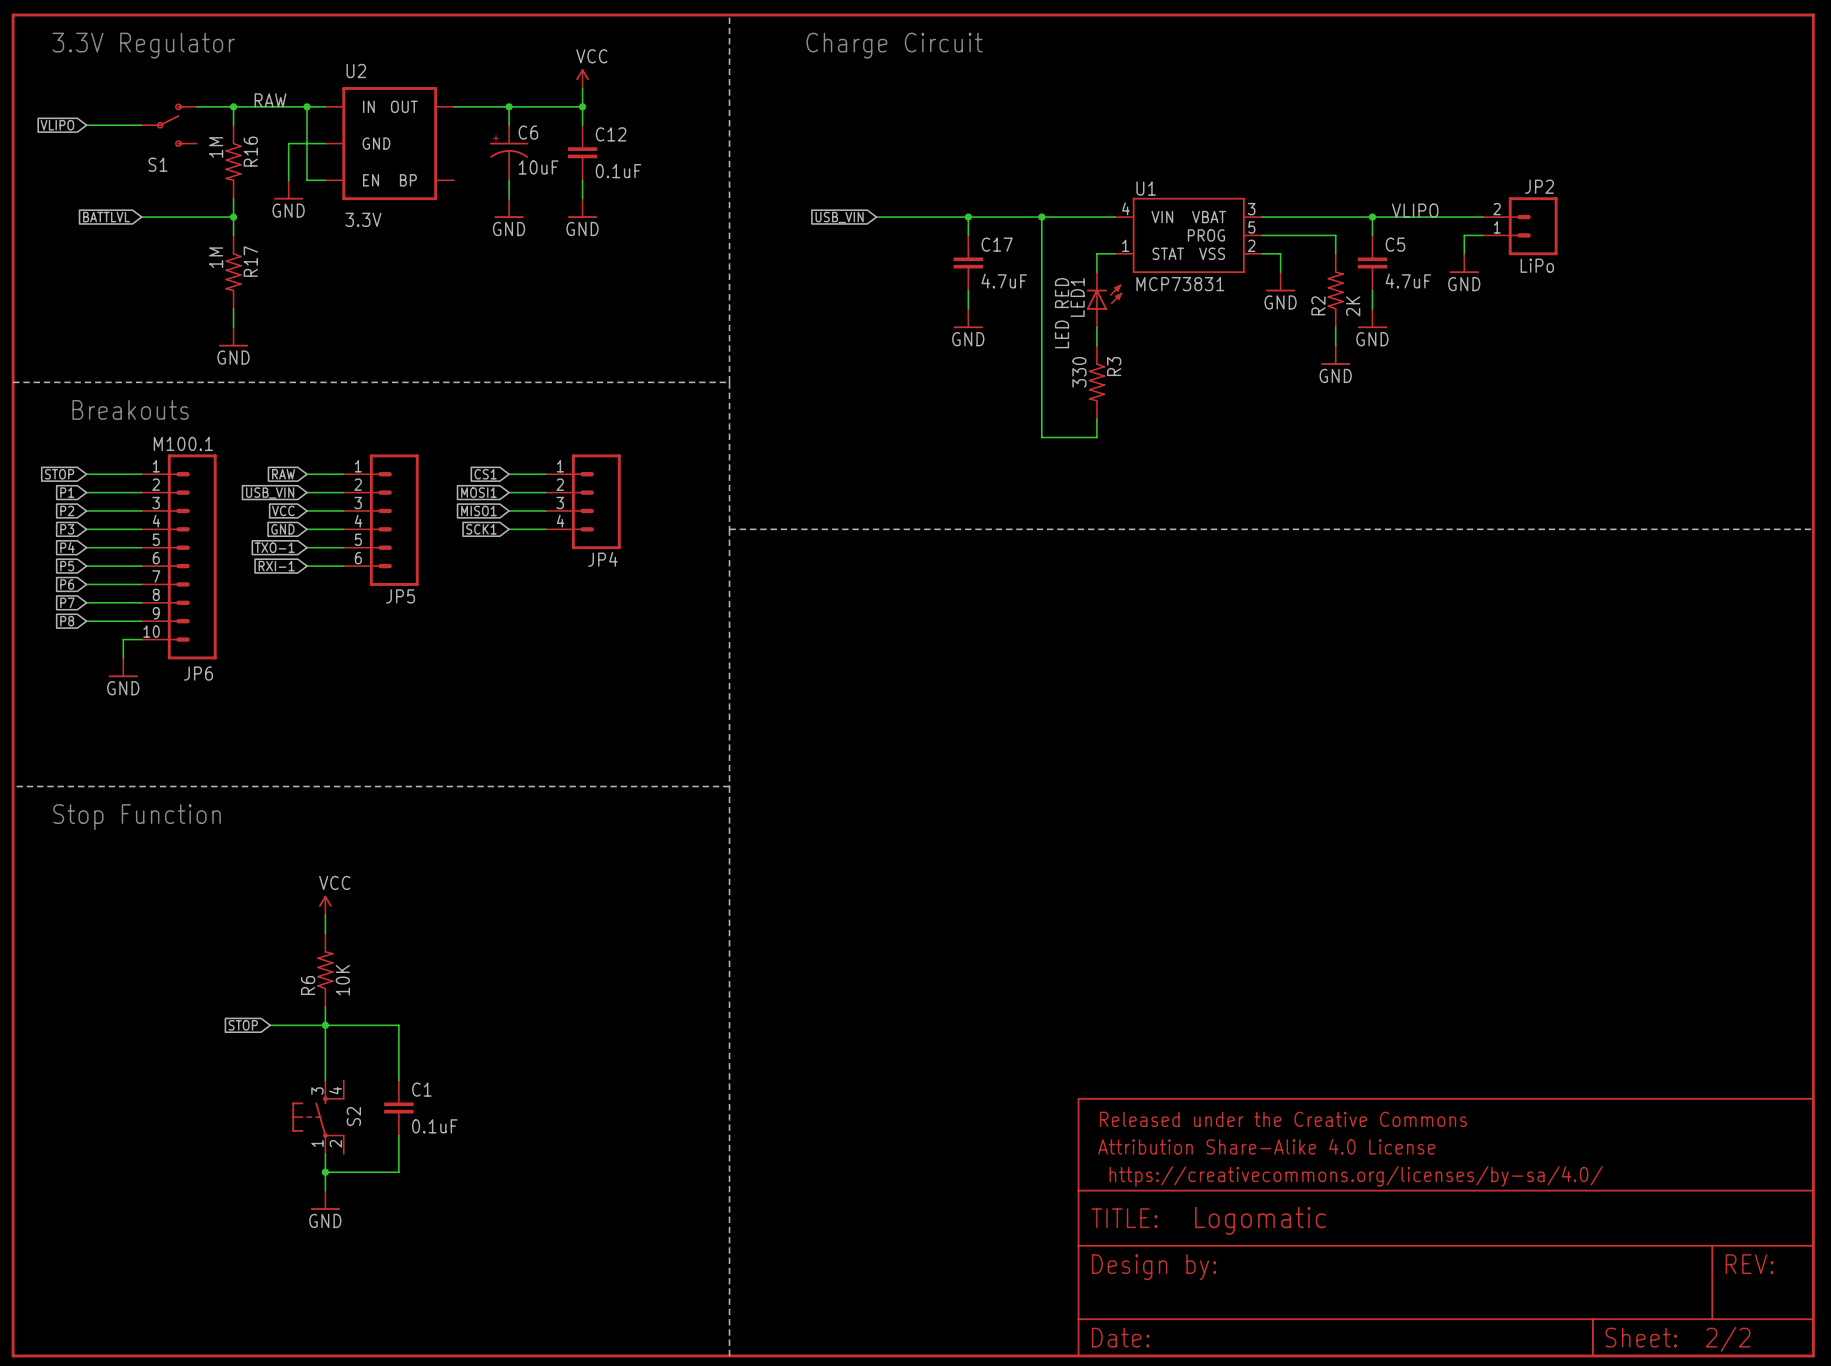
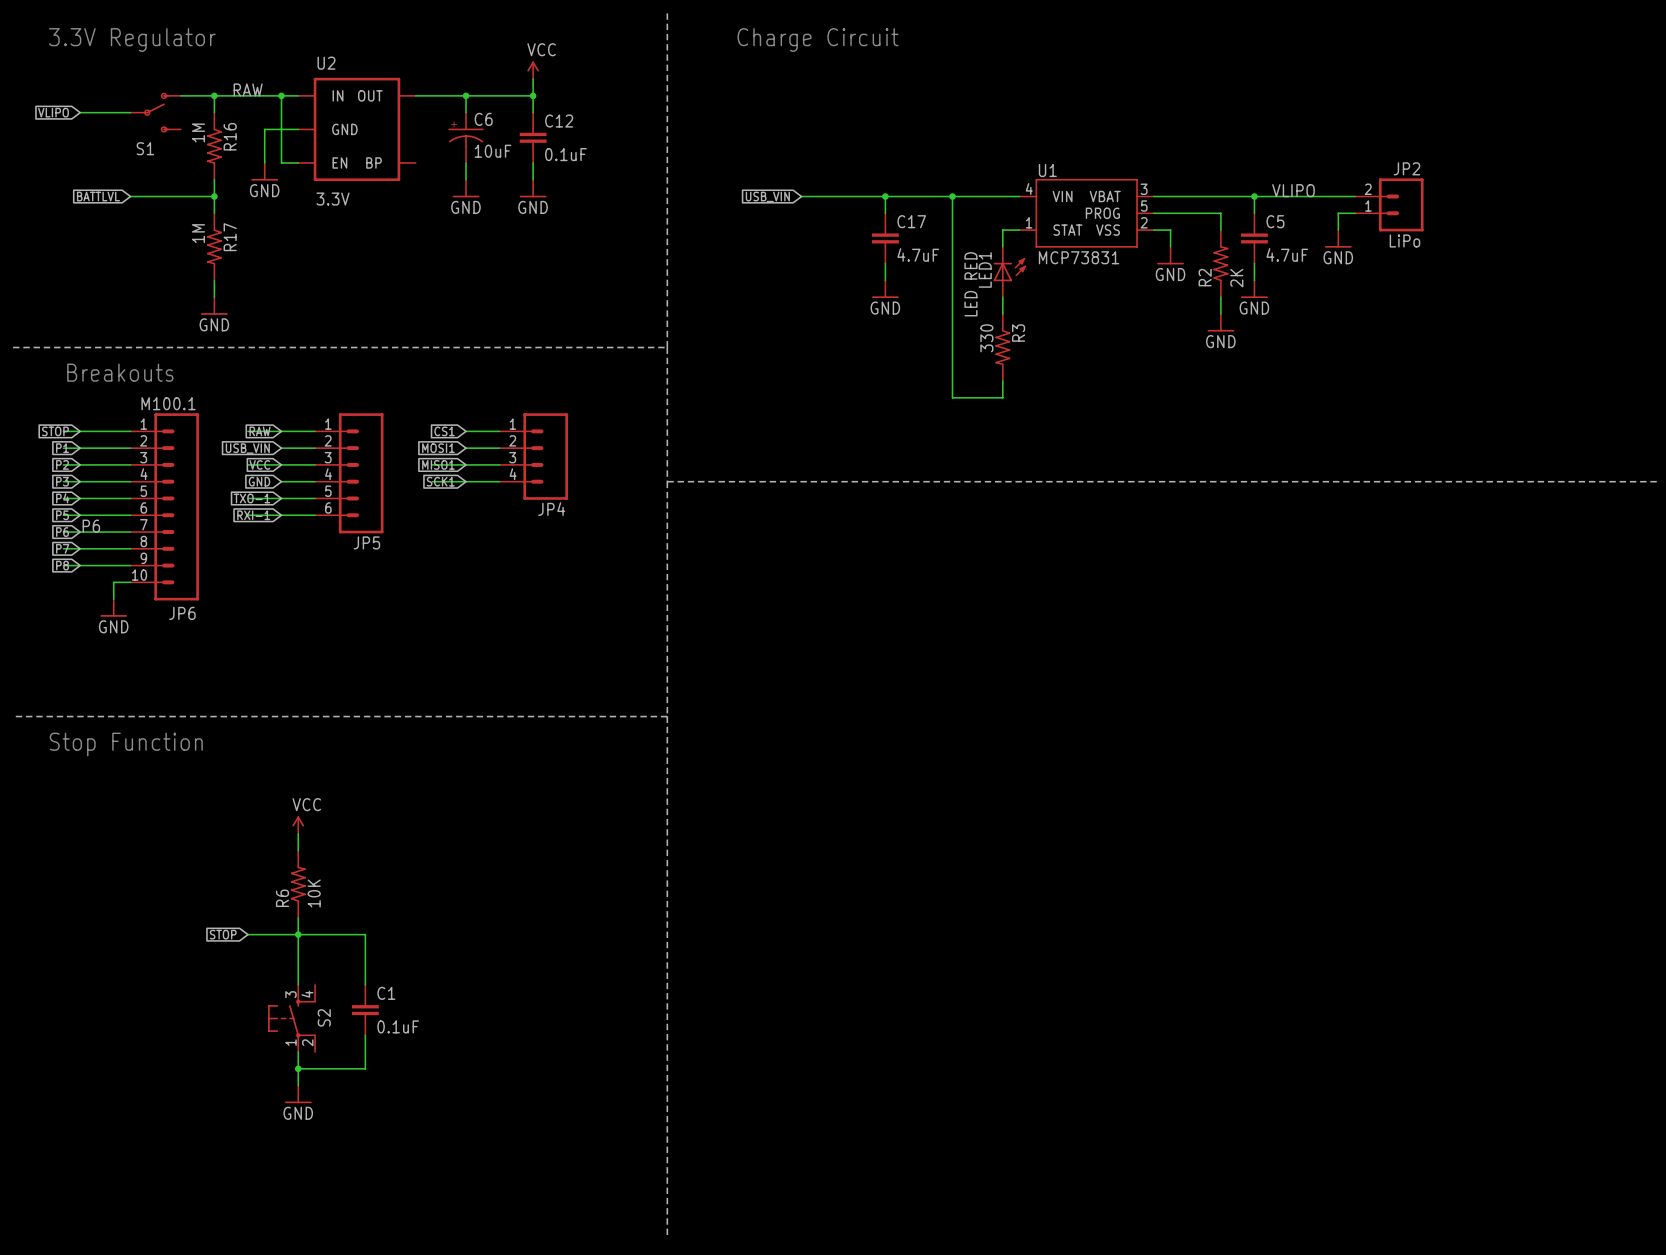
wire: none -> (63, 431) (80, 431)
wire: none -> (247, 431) (281, 431)
wire: none -> (63, 448) (80, 448)
wire: none -> (63, 464) (80, 464)
wire: none -> (247, 464) (281, 464)
wire: none -> (432, 464) (466, 464)
wire: none -> (63, 481) (80, 481)
wire: none -> (432, 481) (466, 481)
wire: none -> (63, 498) (80, 498)
wire: none -> (247, 498) (281, 498)
wire: none -> (63, 515) (80, 515)
wire: none -> (247, 515) (281, 515)
label: none -> P6 (91, 526)
wire: none -> (63, 532) (80, 532)
wire: none -> (63, 548) (80, 548)
wire: none -> (63, 565) (80, 565)
part: (913, 685) -> none
part: (1445, 1227) -> none

